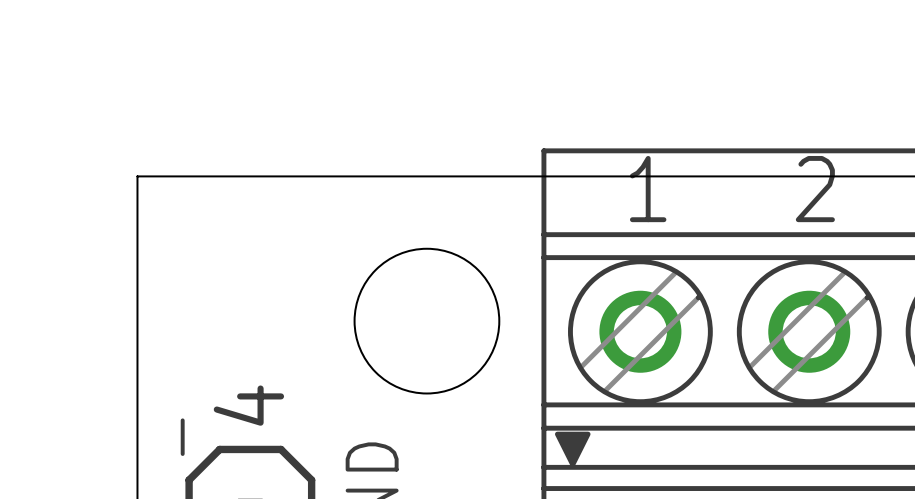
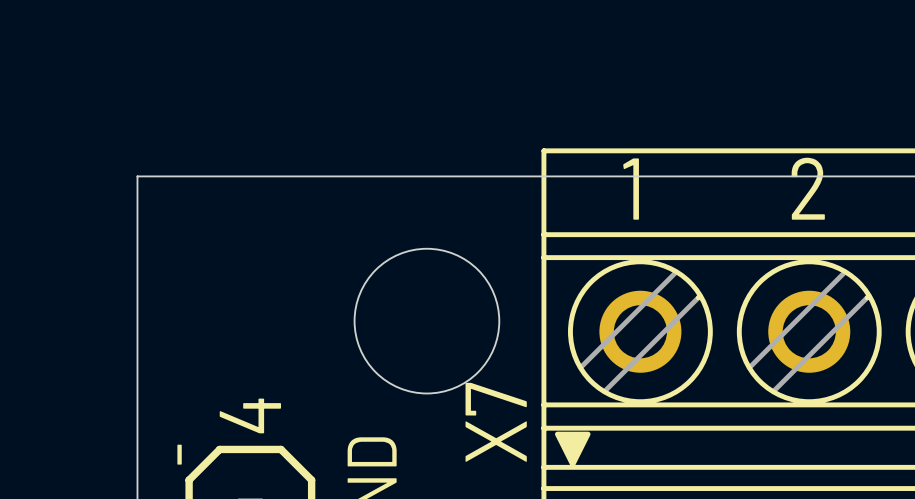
X7 name: none -> X7 (496, 422)

